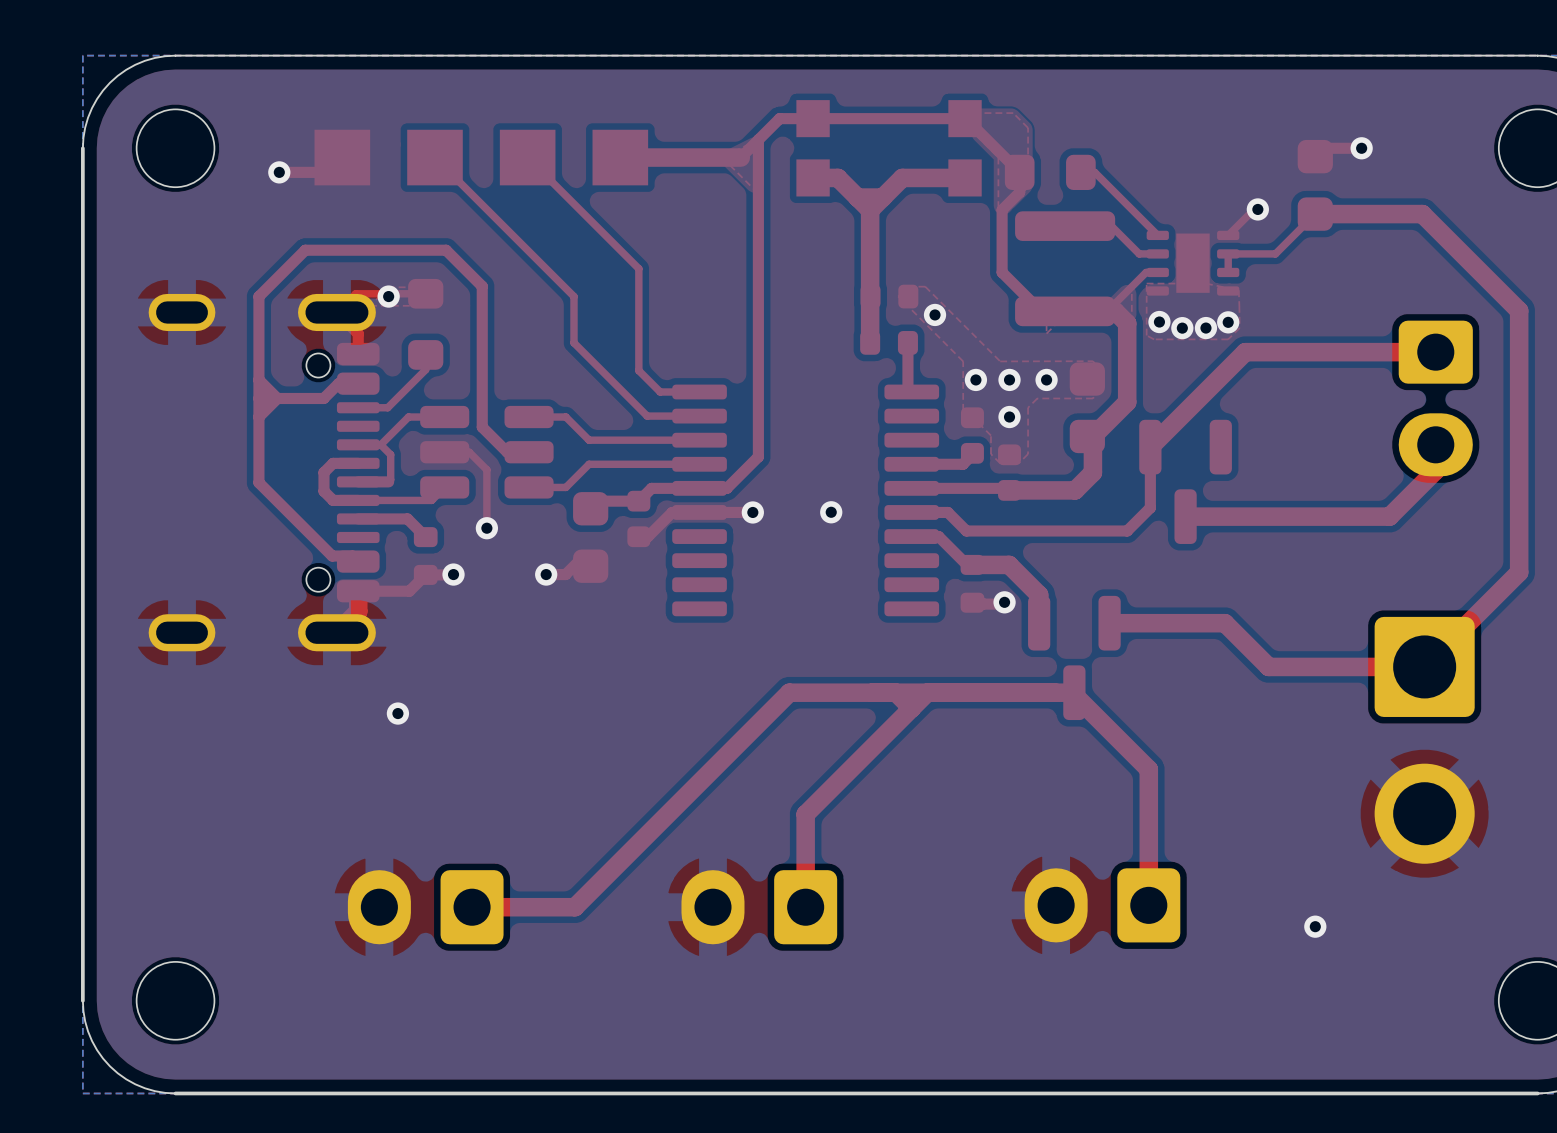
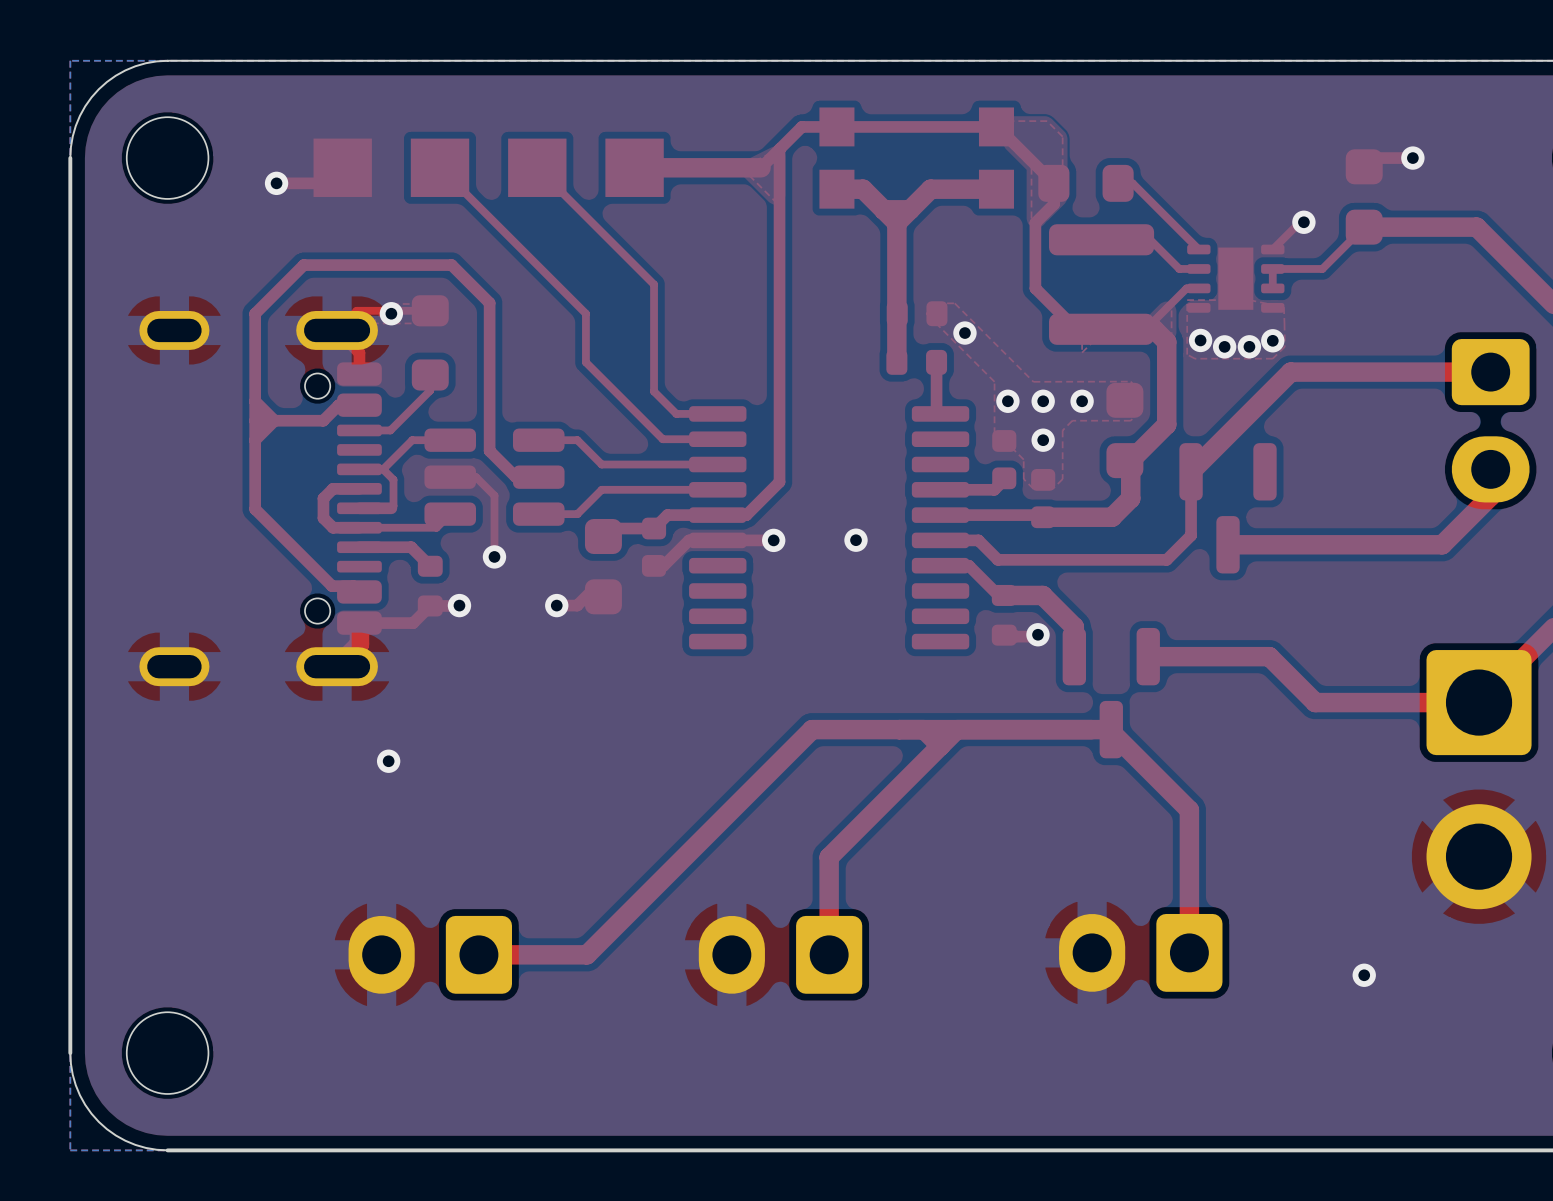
via position: (397, 713) -> (388, 761)

